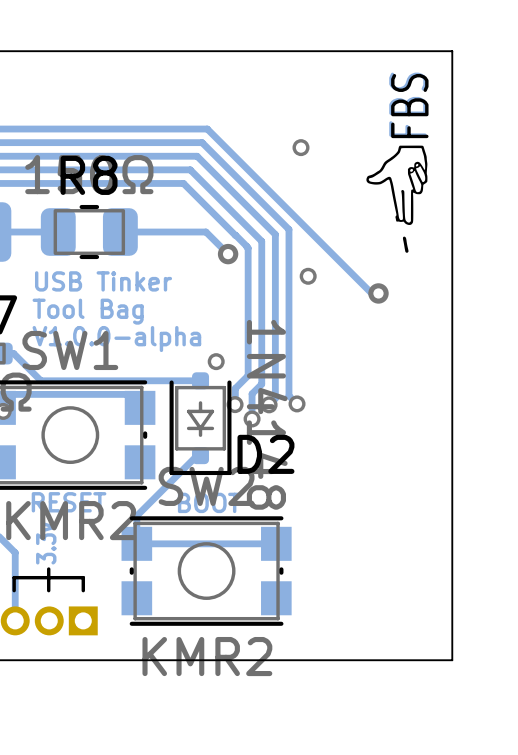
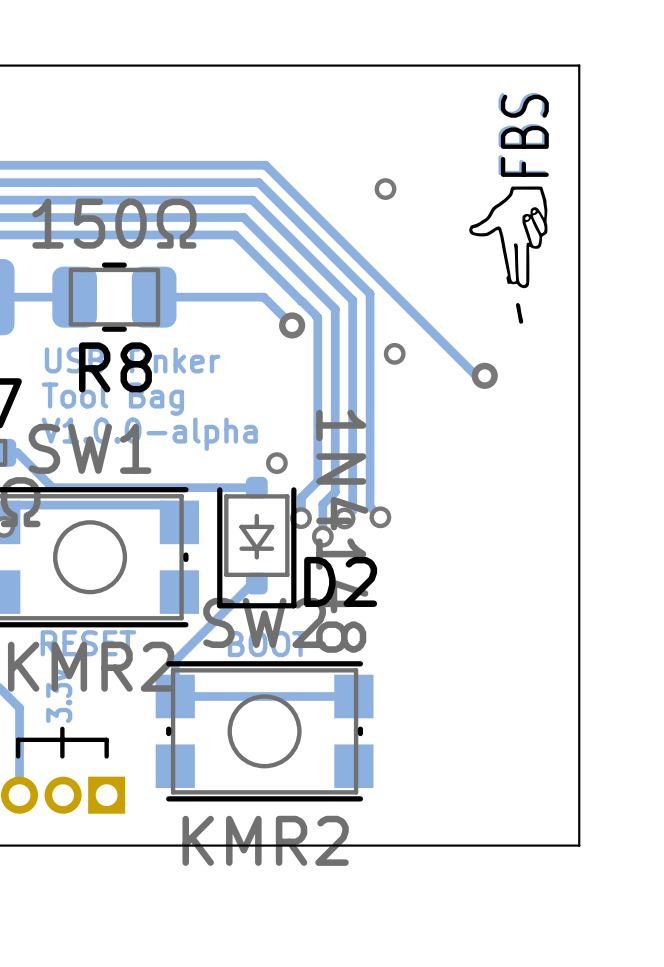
R8 name position: R8 (89, 175) -> R8 (115, 367)

